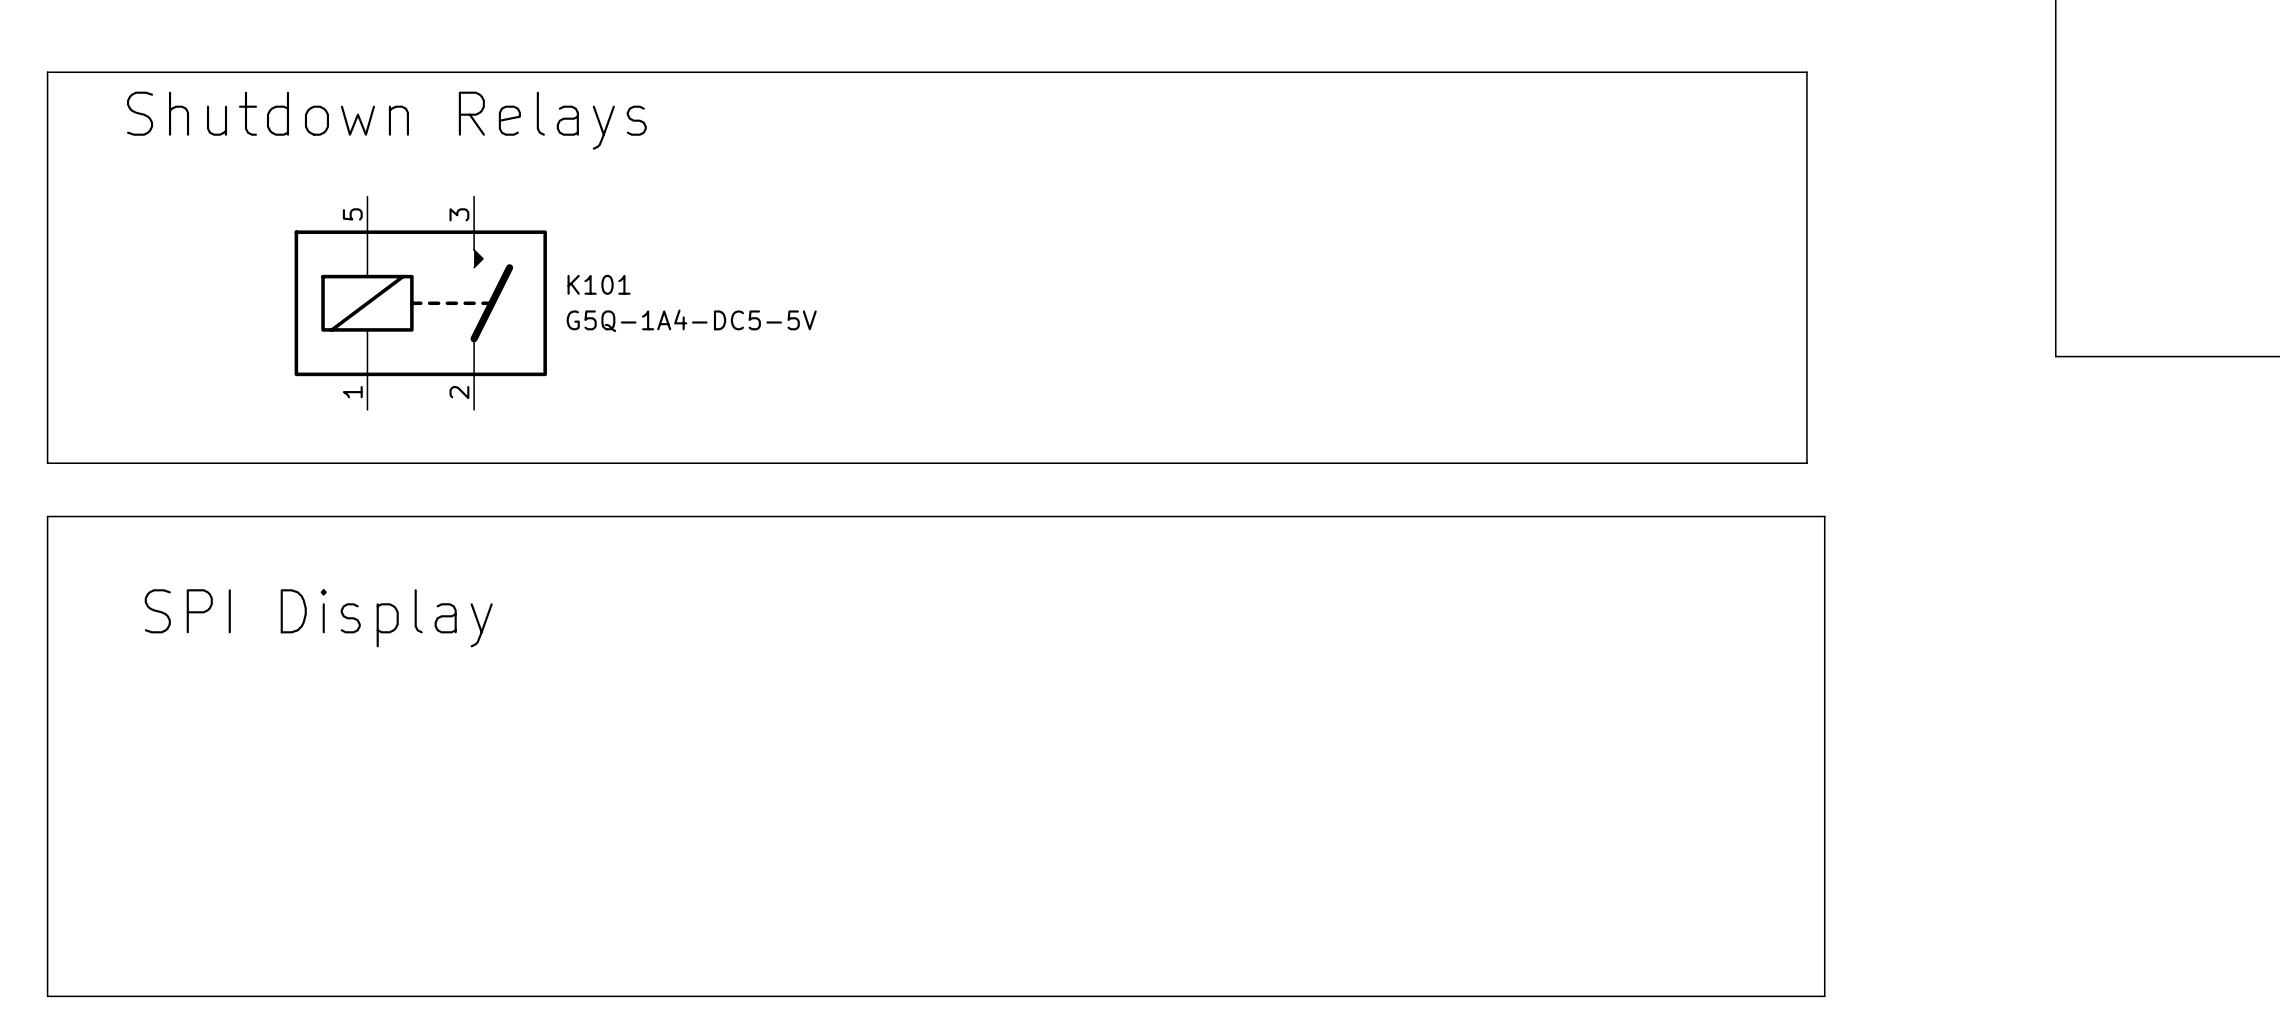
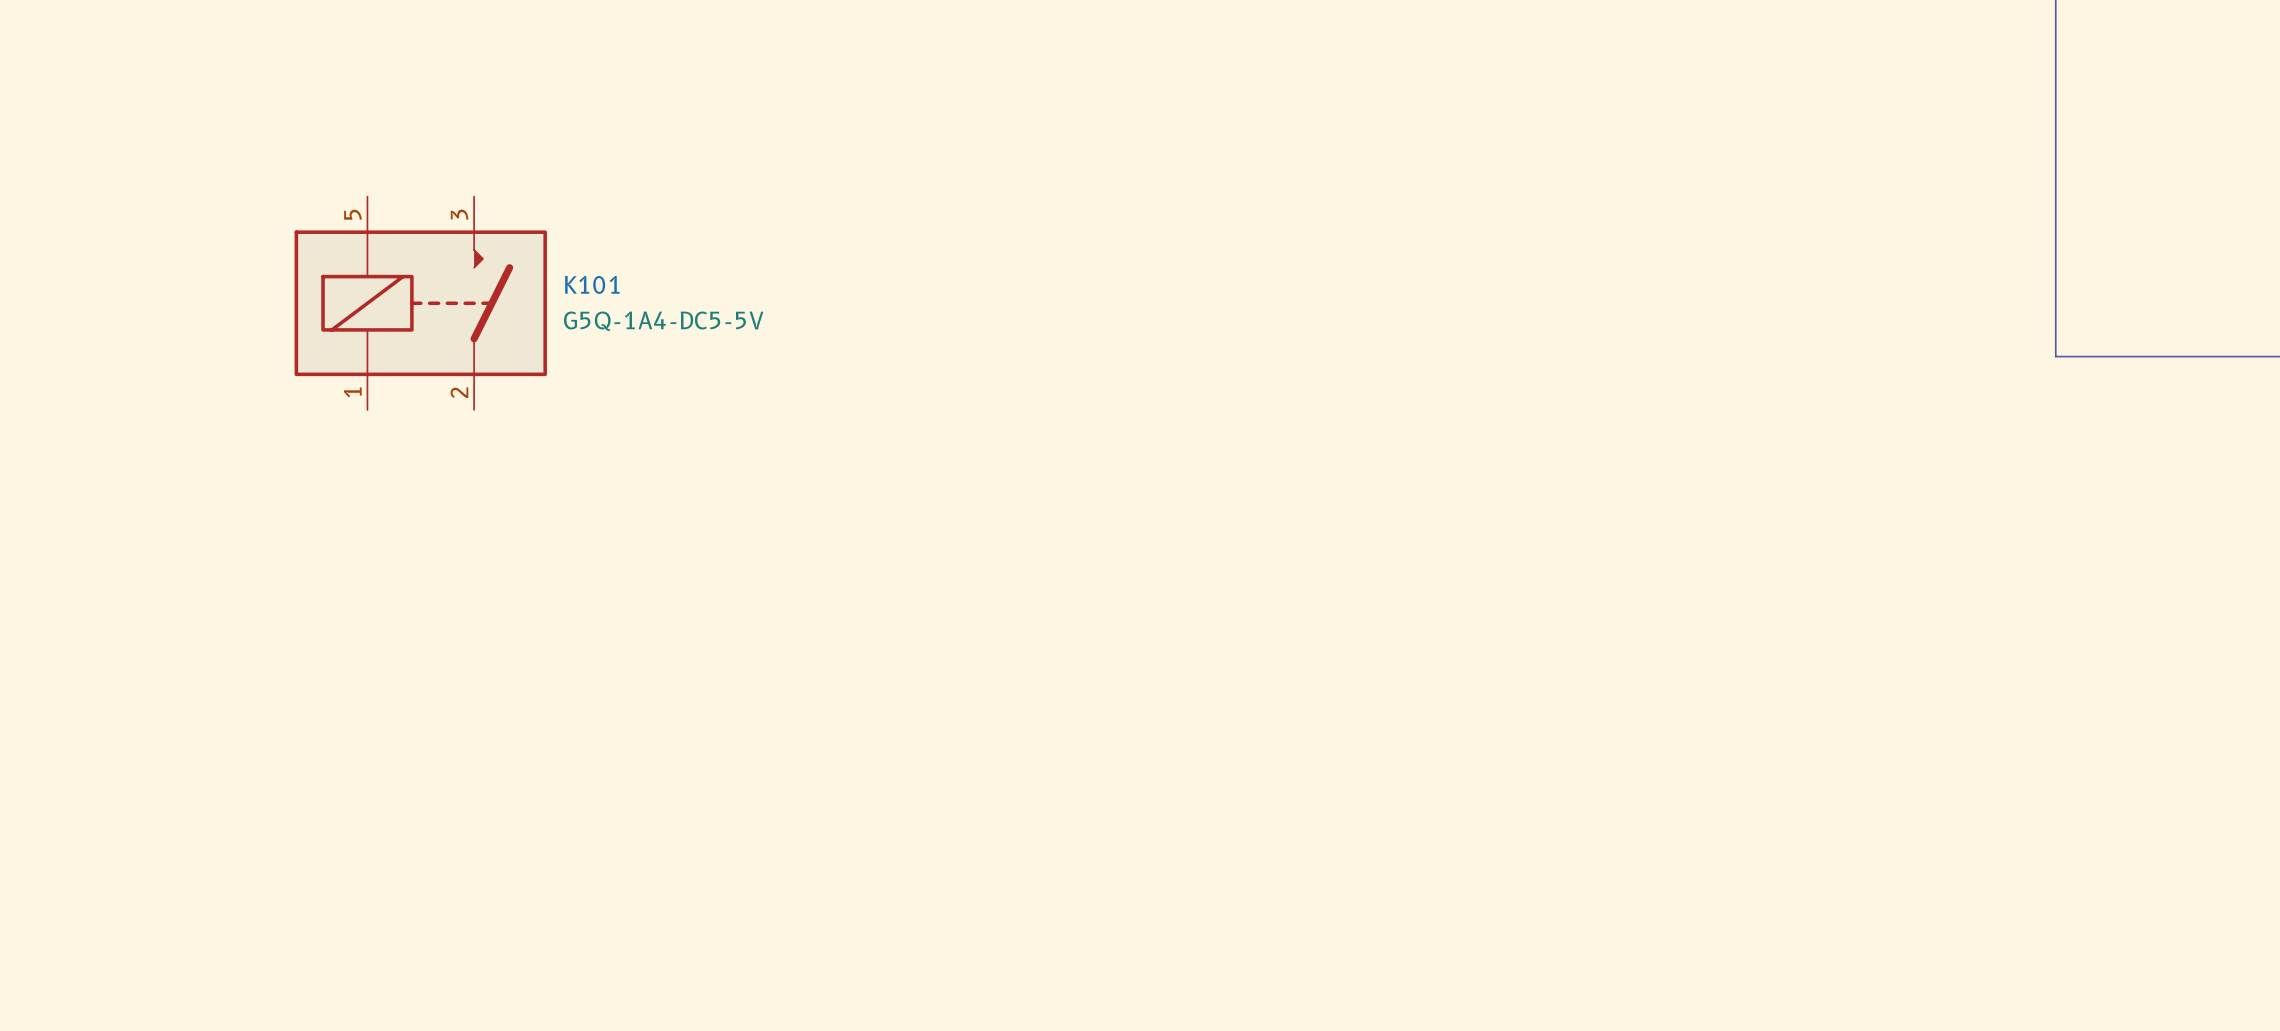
line: (47, 72) (1806, 72) (1806, 463) (47, 463) (47, 72) -> none
text: Shutdown Relays (386, 120) -> none
line: (47, 516) (47, 996) (1824, 996) (1824, 516) (47, 516) -> none
text: SPI Display (318, 618) -> none

